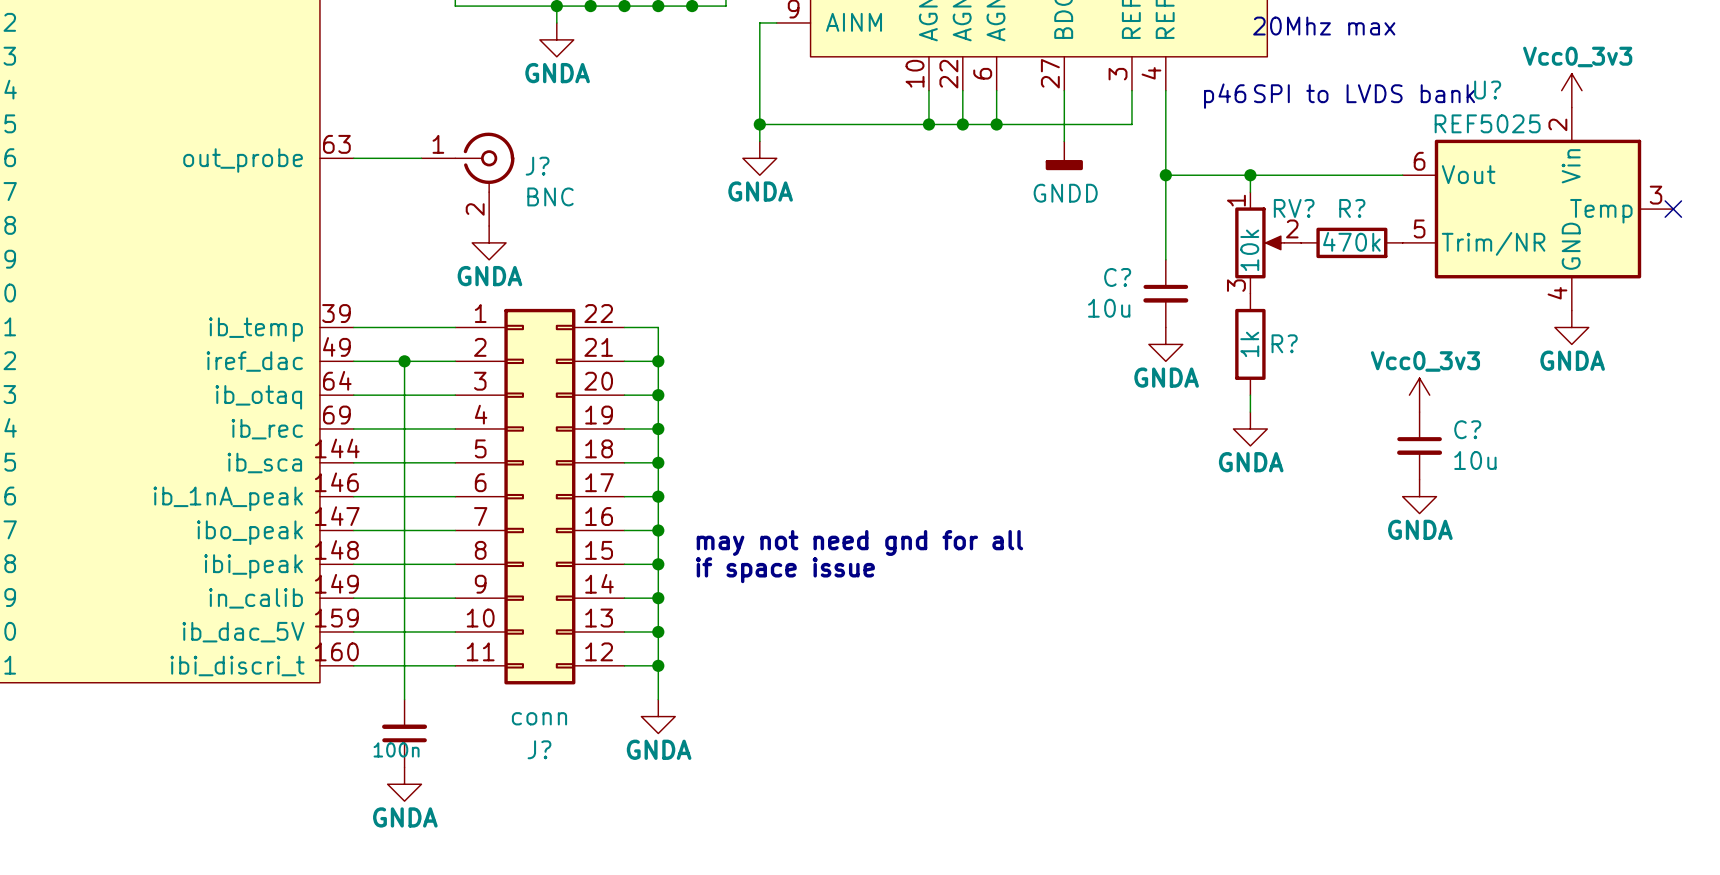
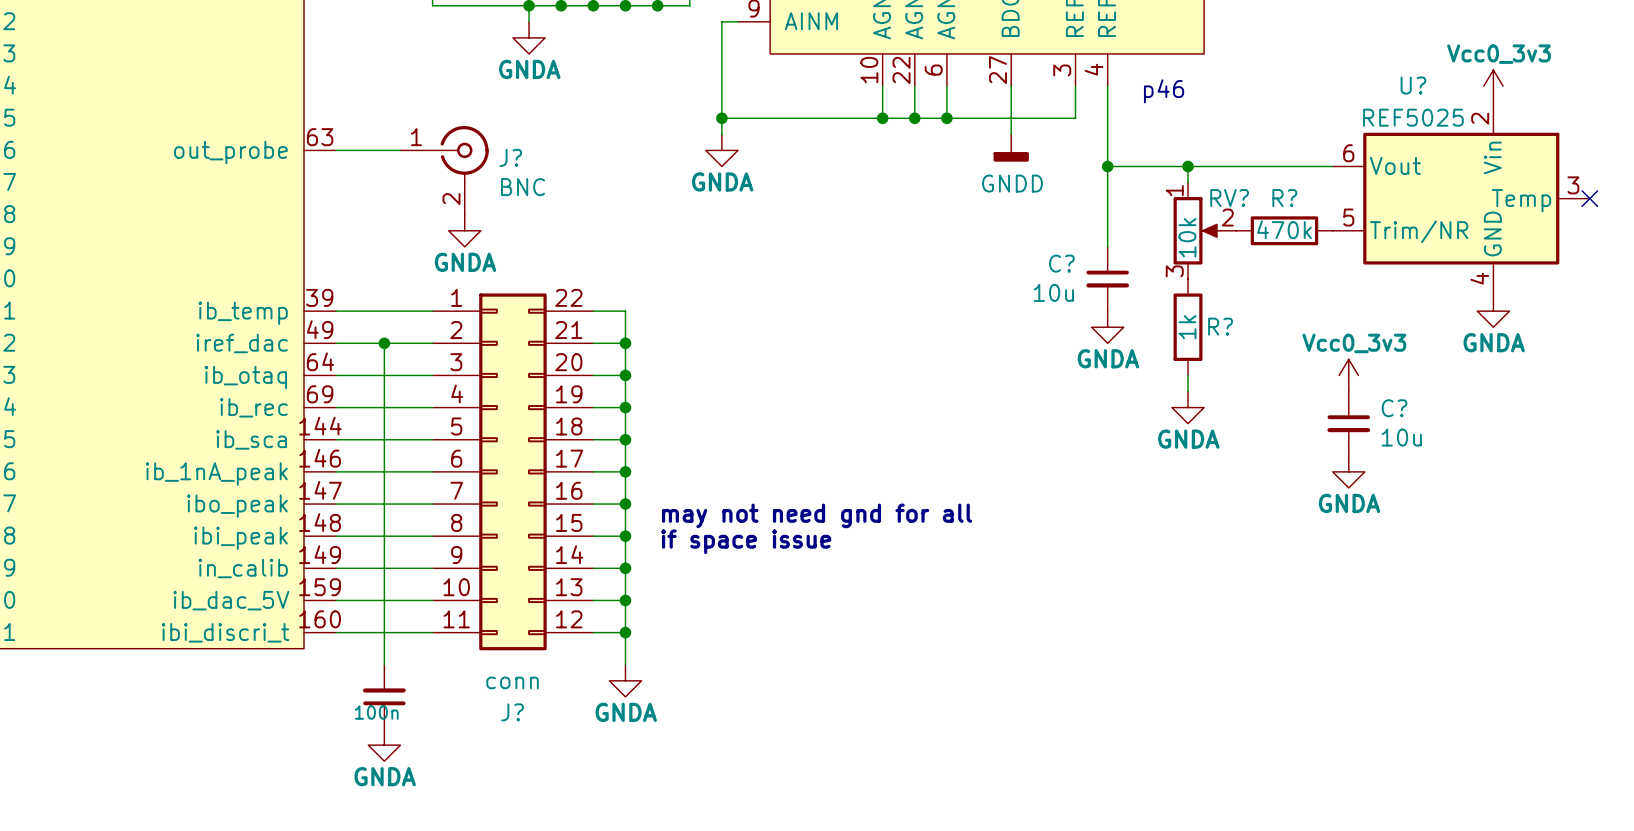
text: 20Mhz max (1324, 26) -> none
text: SPI to LVDS bank (1364, 93) -> none

